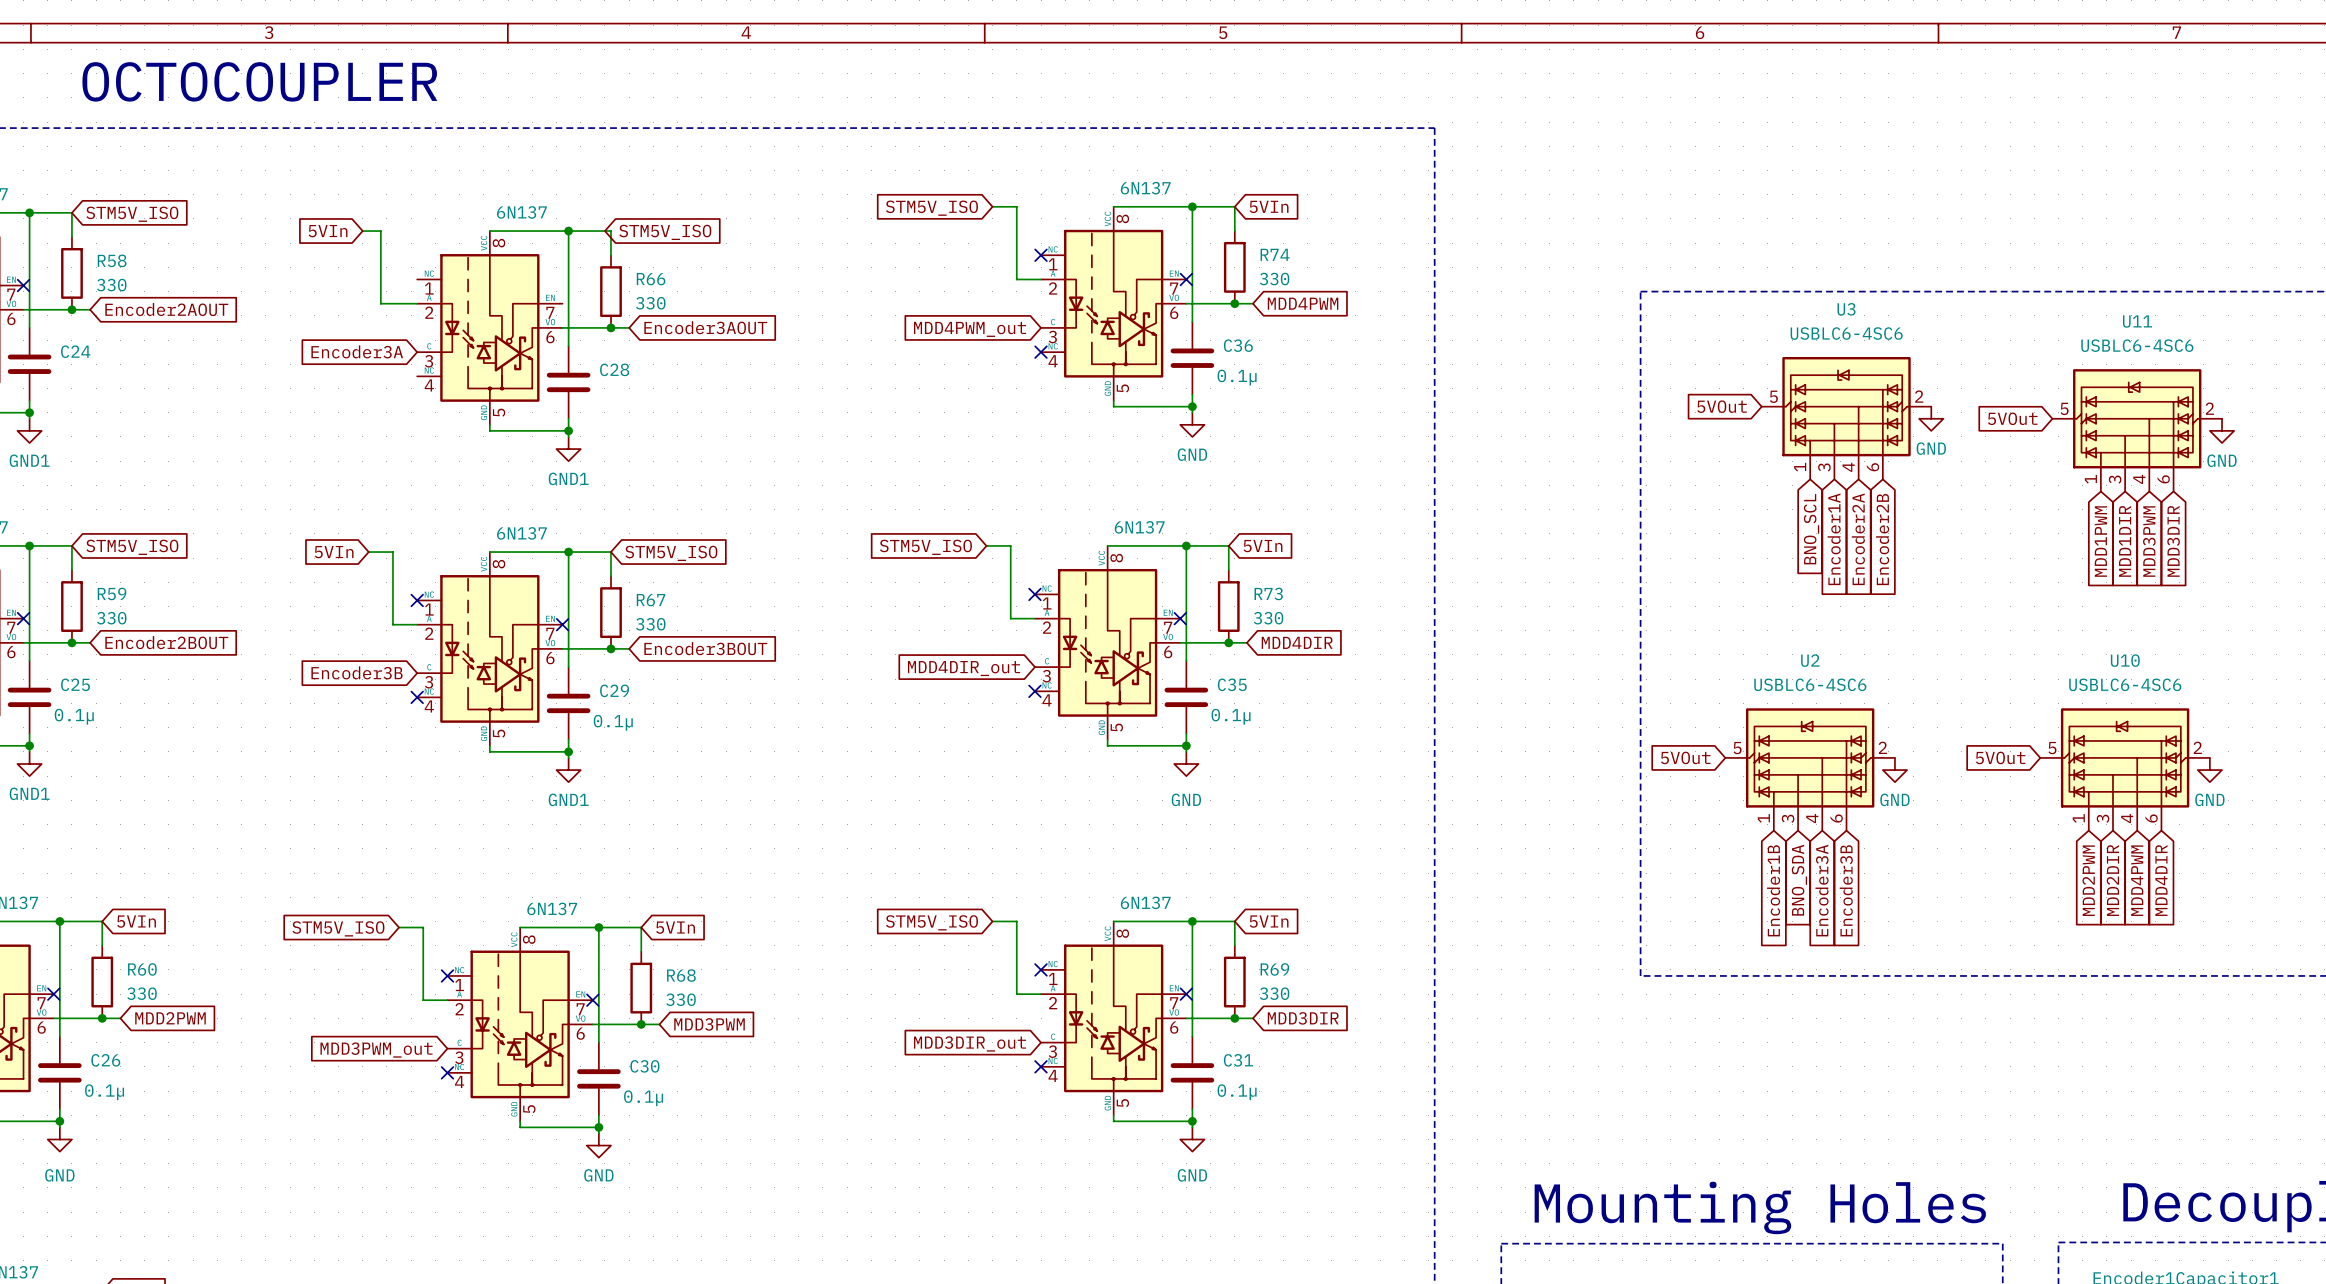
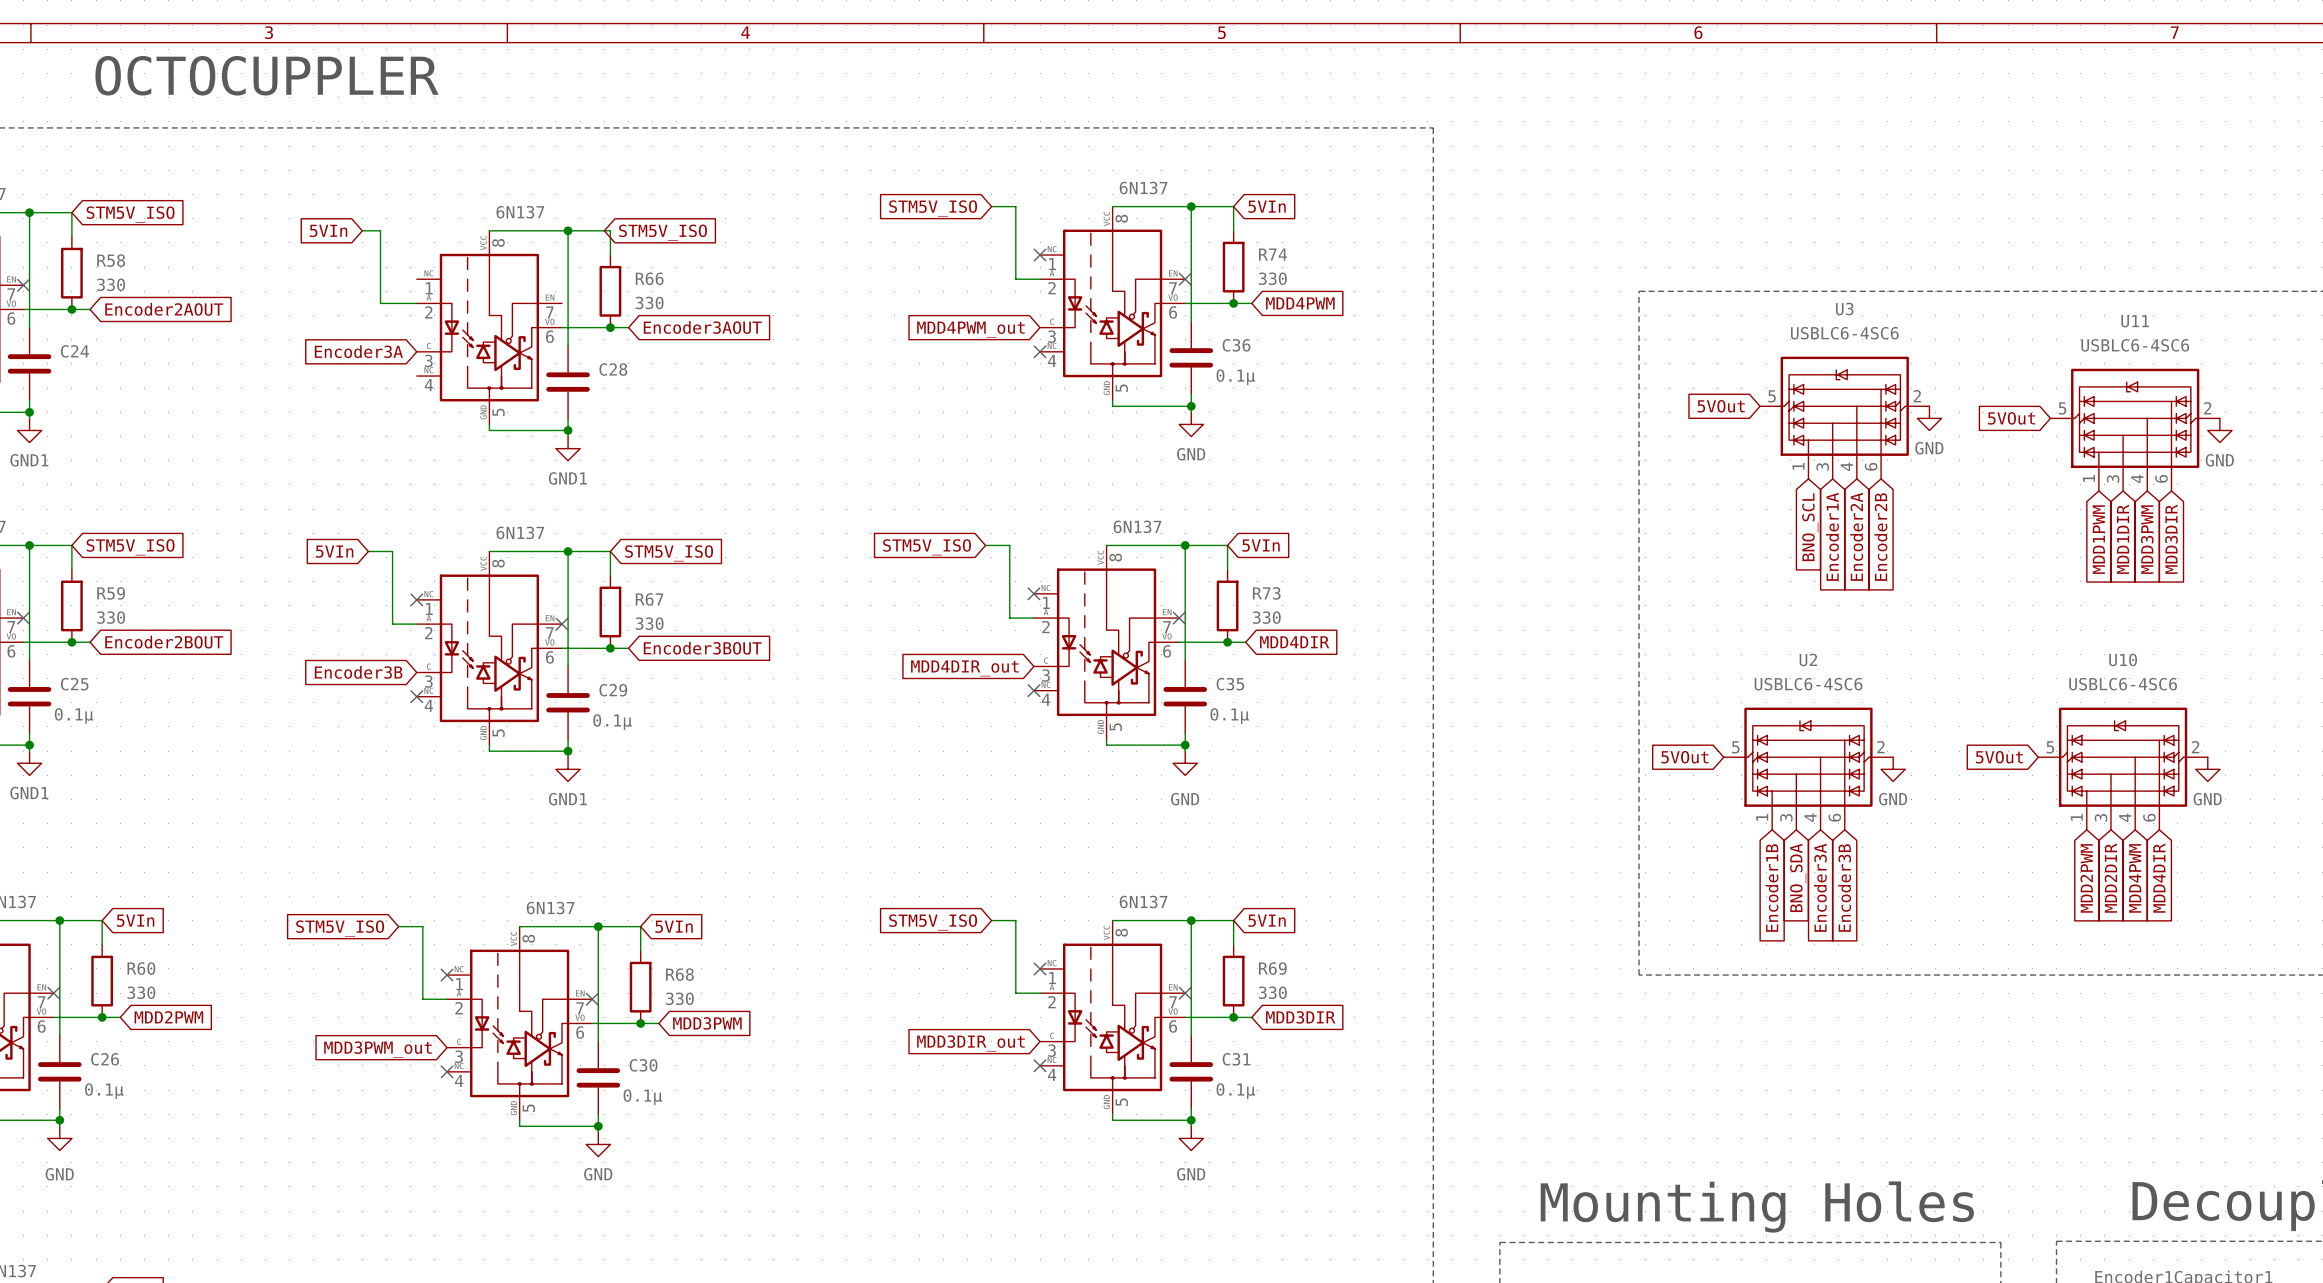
text: OCTOCOUPLER (259, 81) -> OCTOCUPPLER (267, 75)

